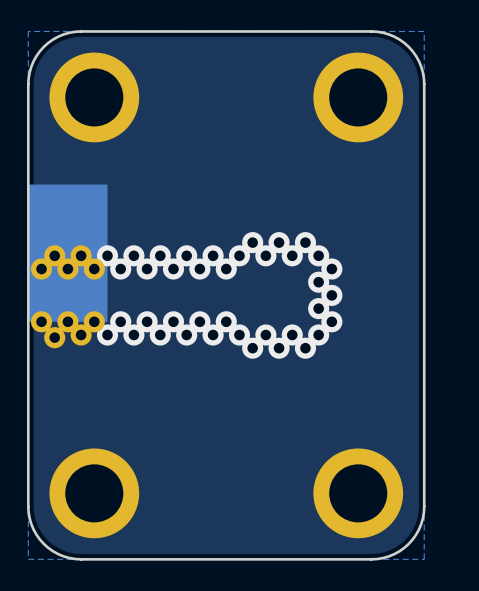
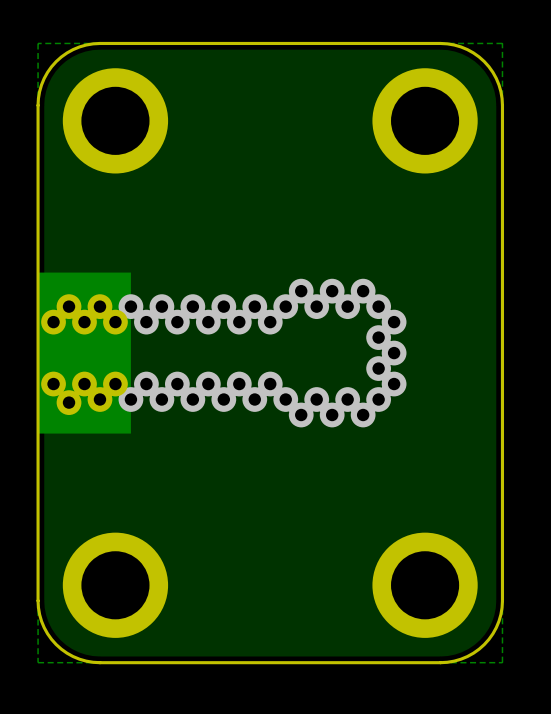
part: (67, 266) -> none
part: none -> (84, 353)

